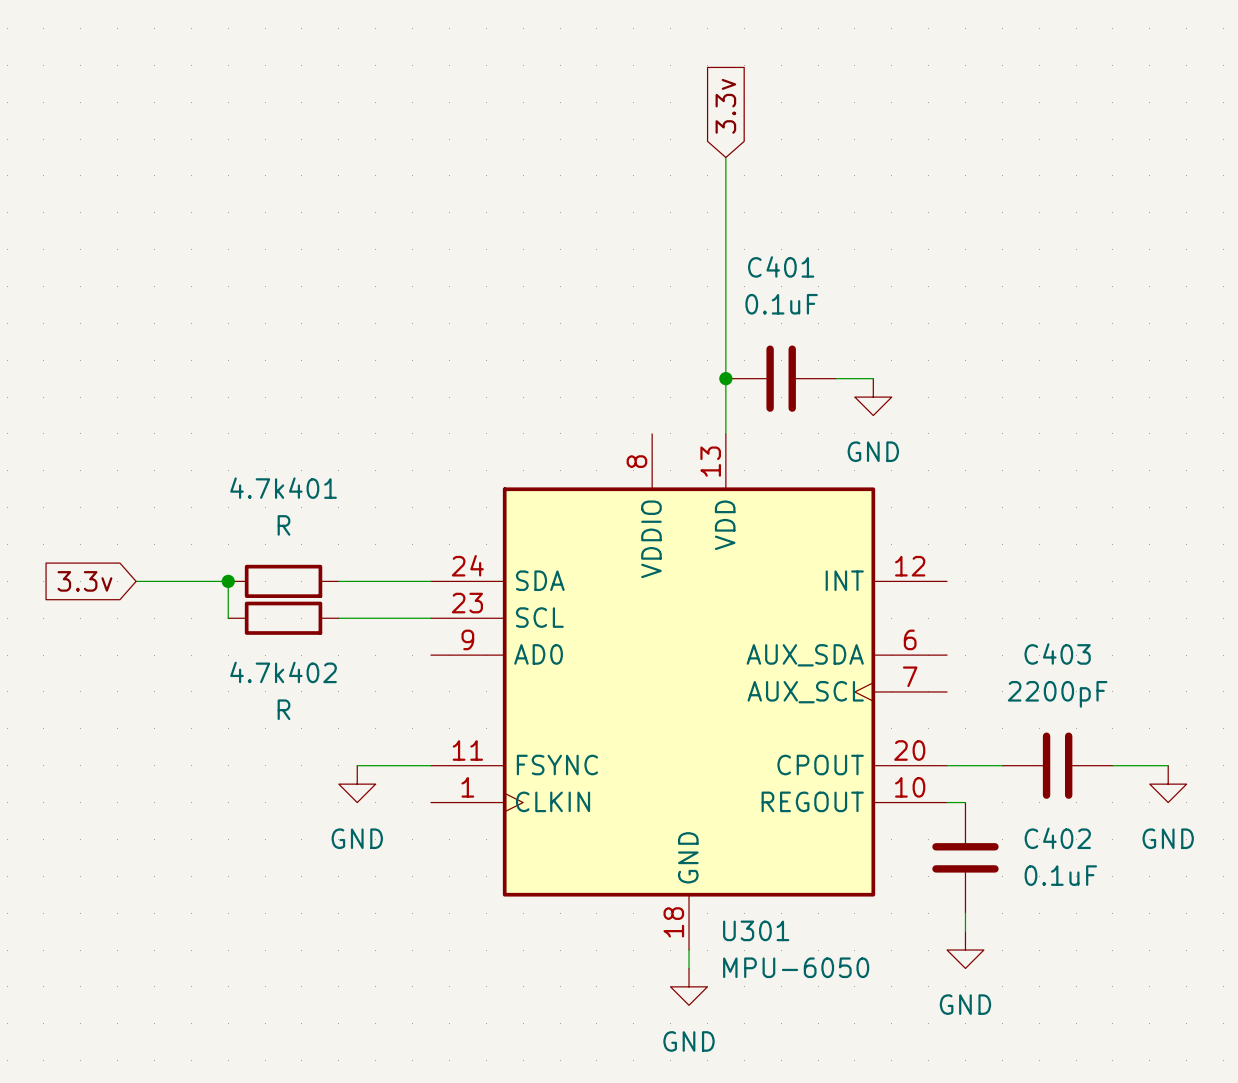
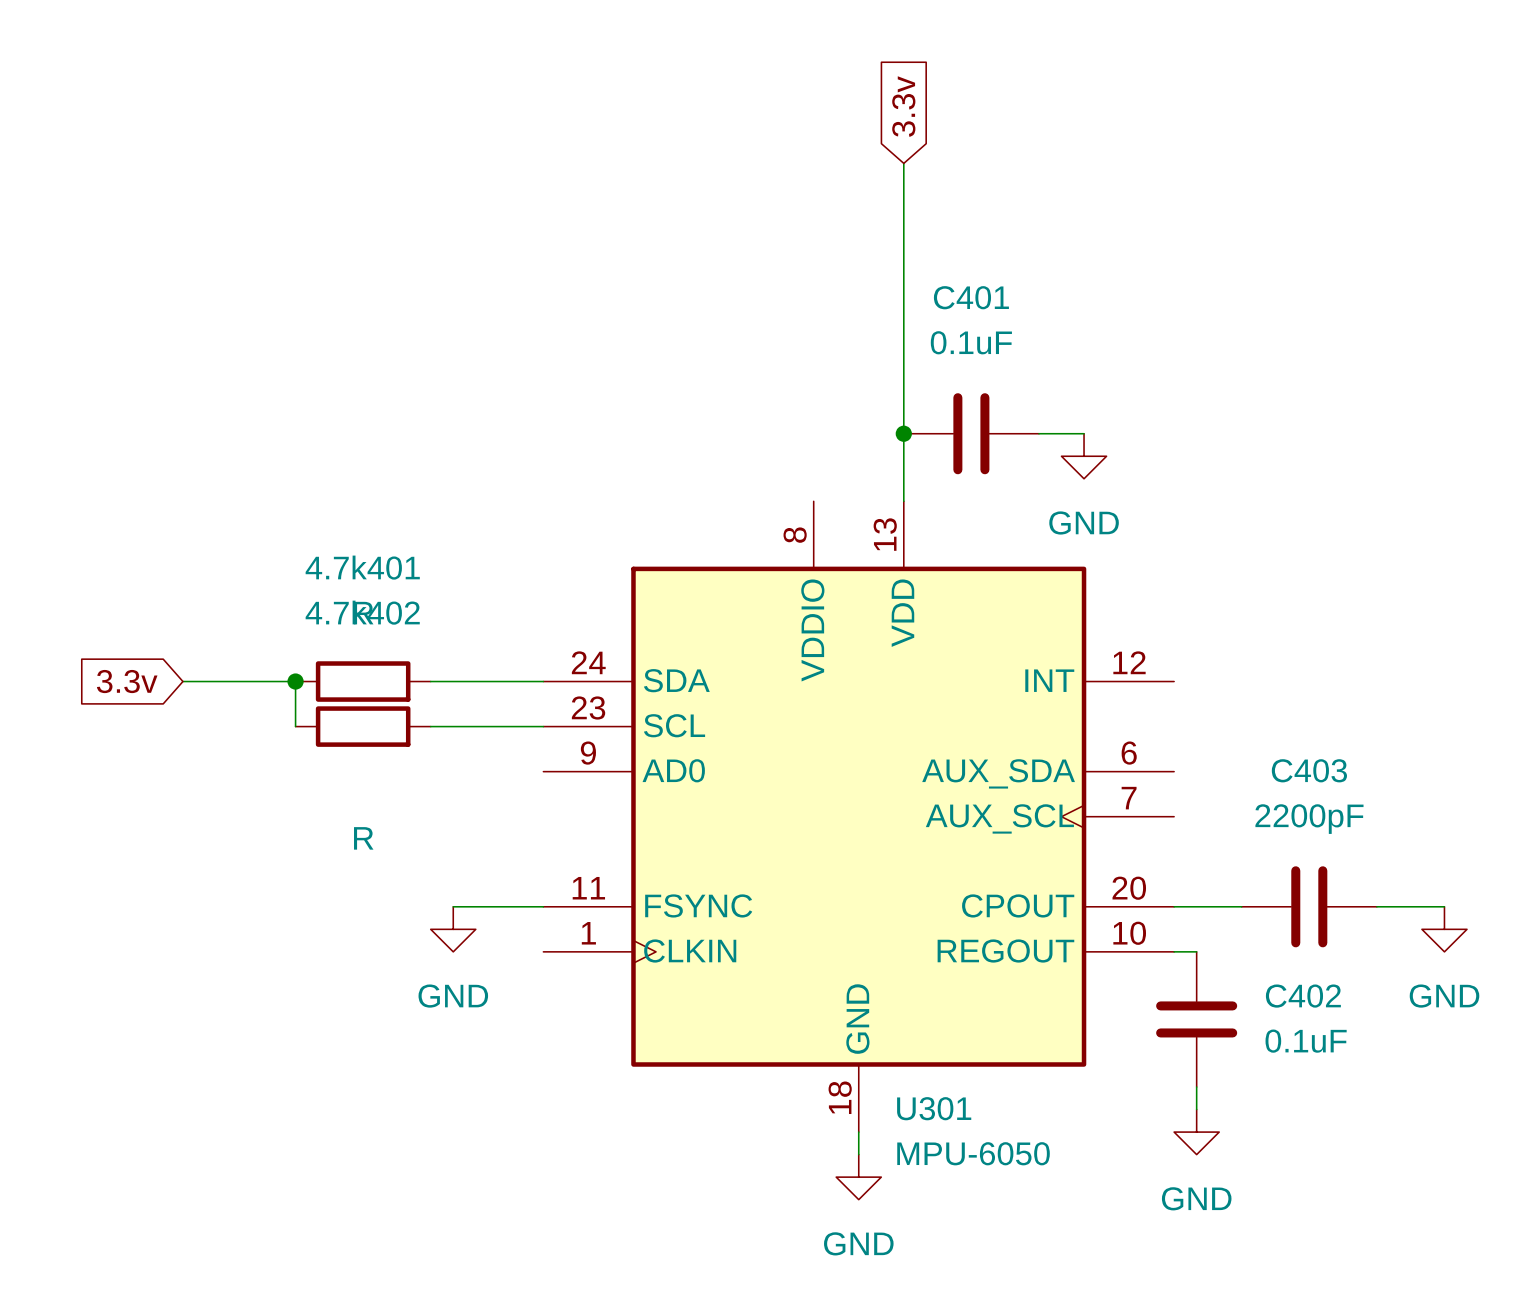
4.7k402 name position: 4.7k402 (283, 672) -> 4.7k402 (362, 612)

